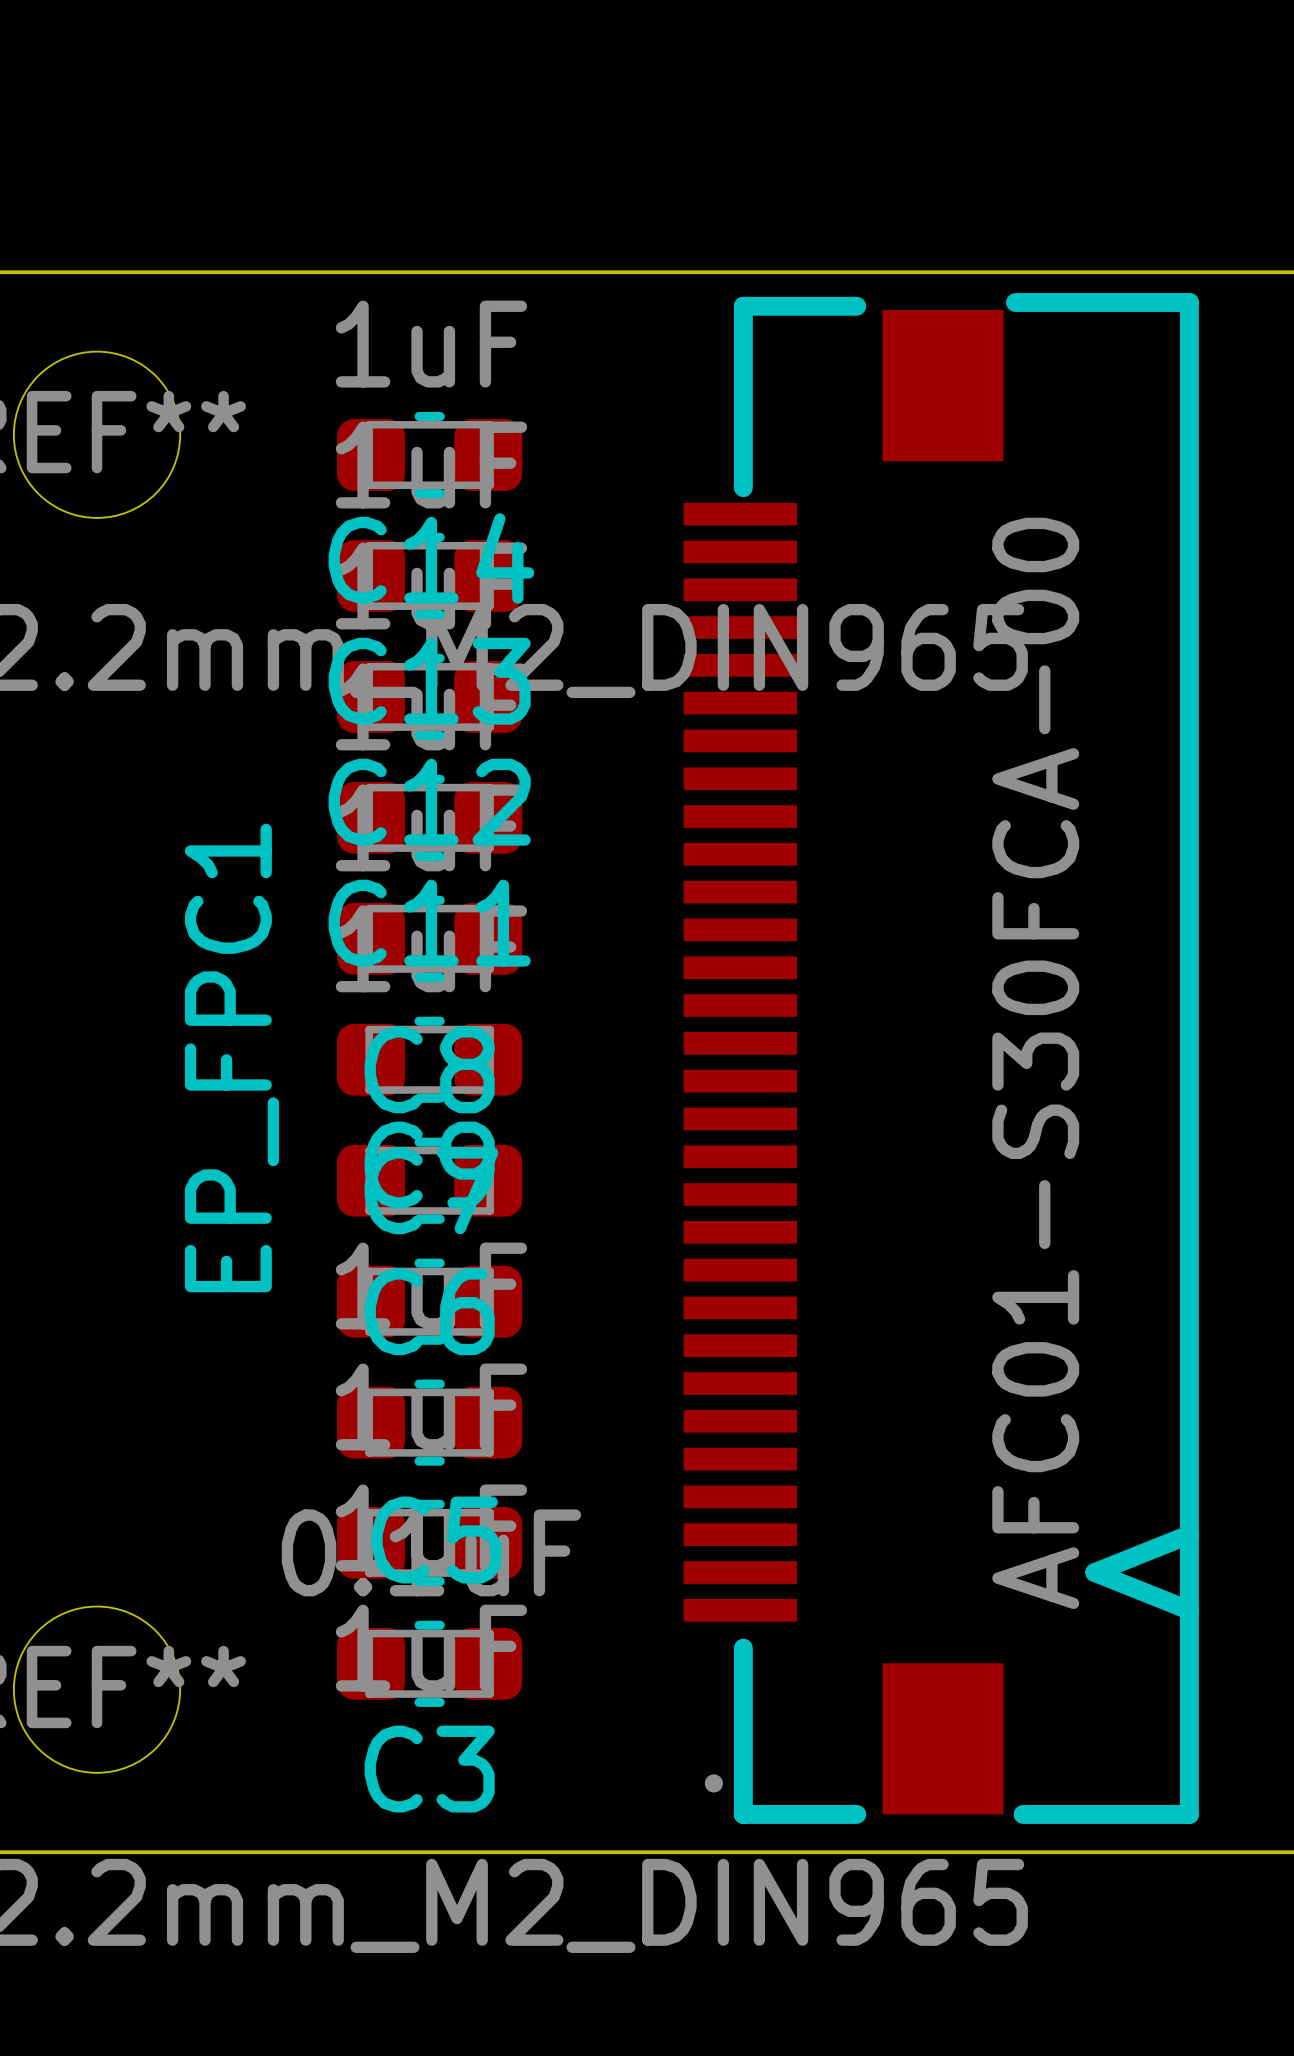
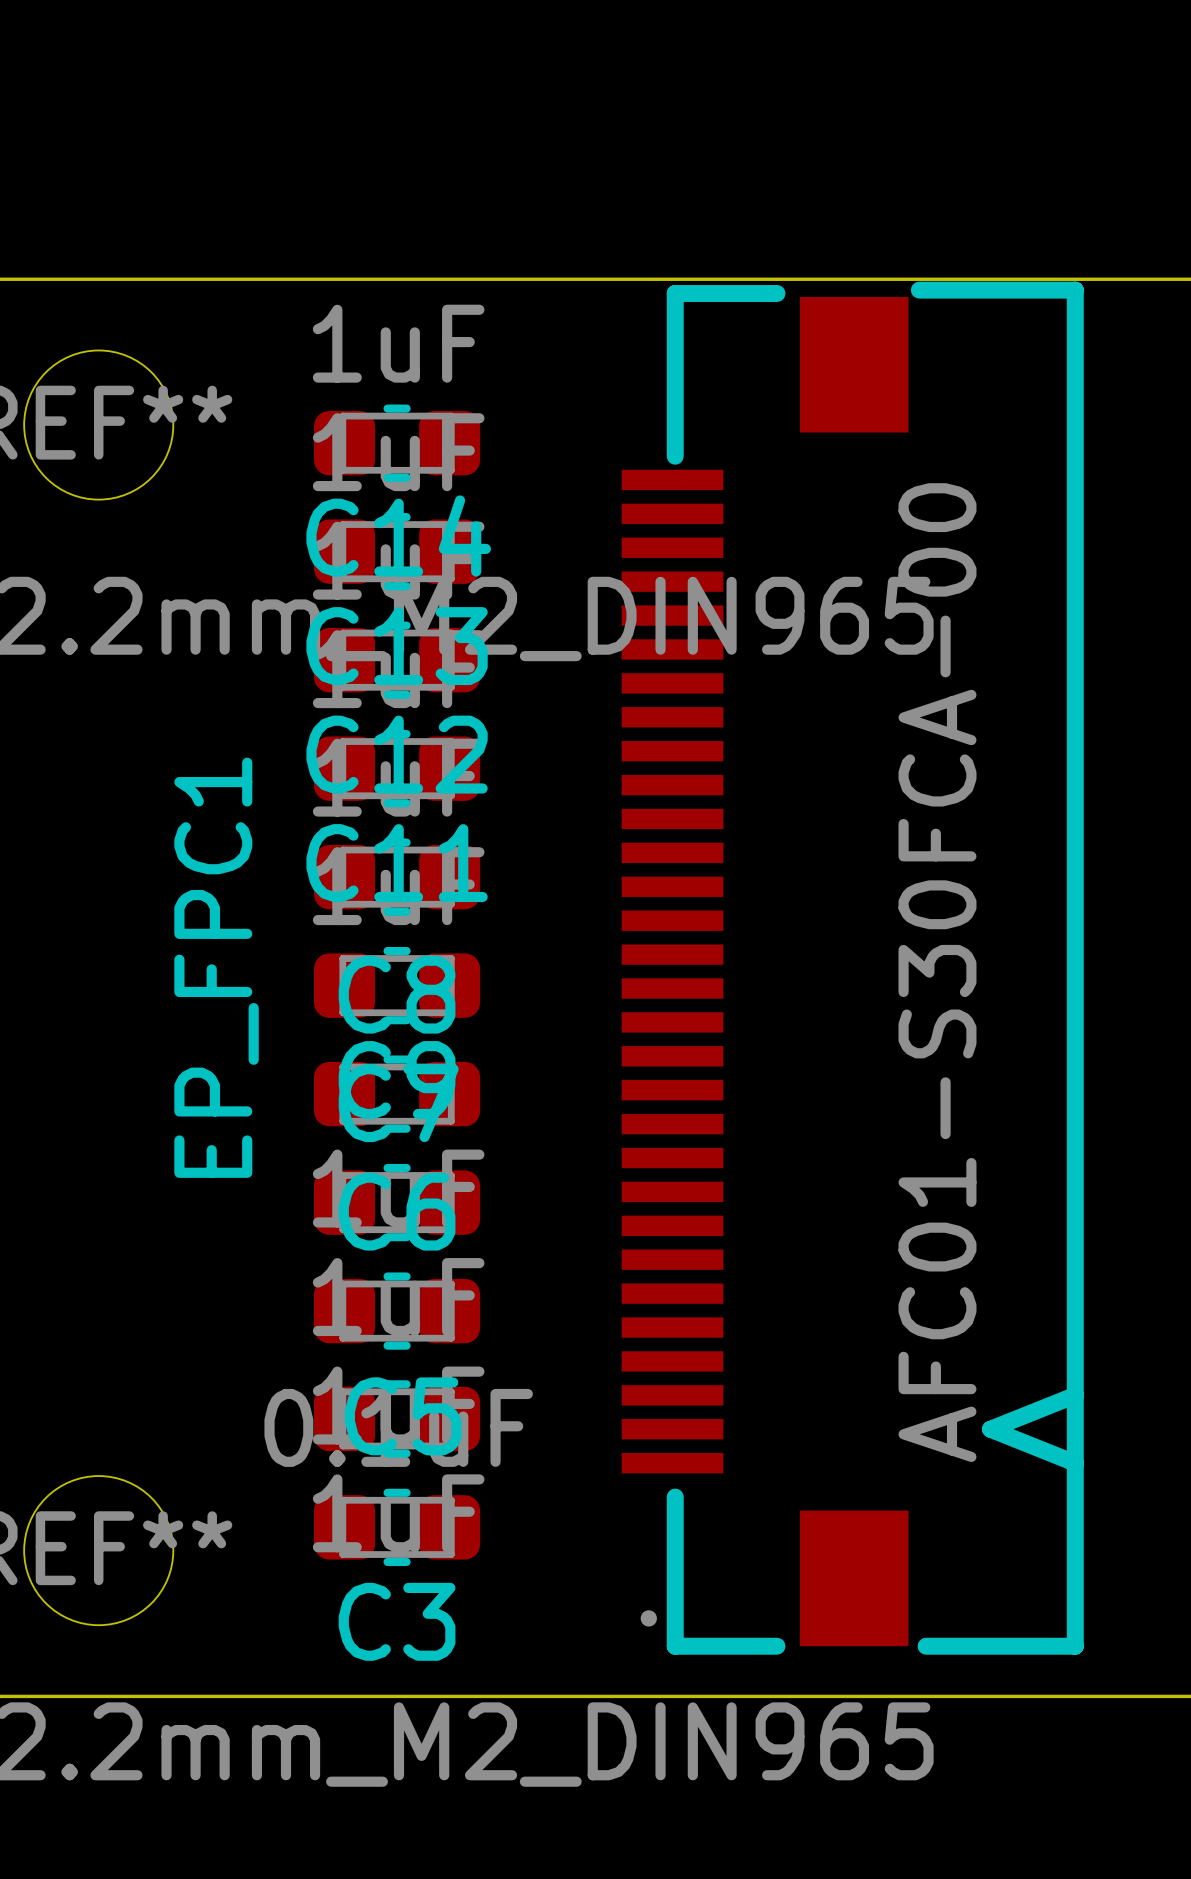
EP_FPC1 position: (941, 1058) -> (852, 968)

